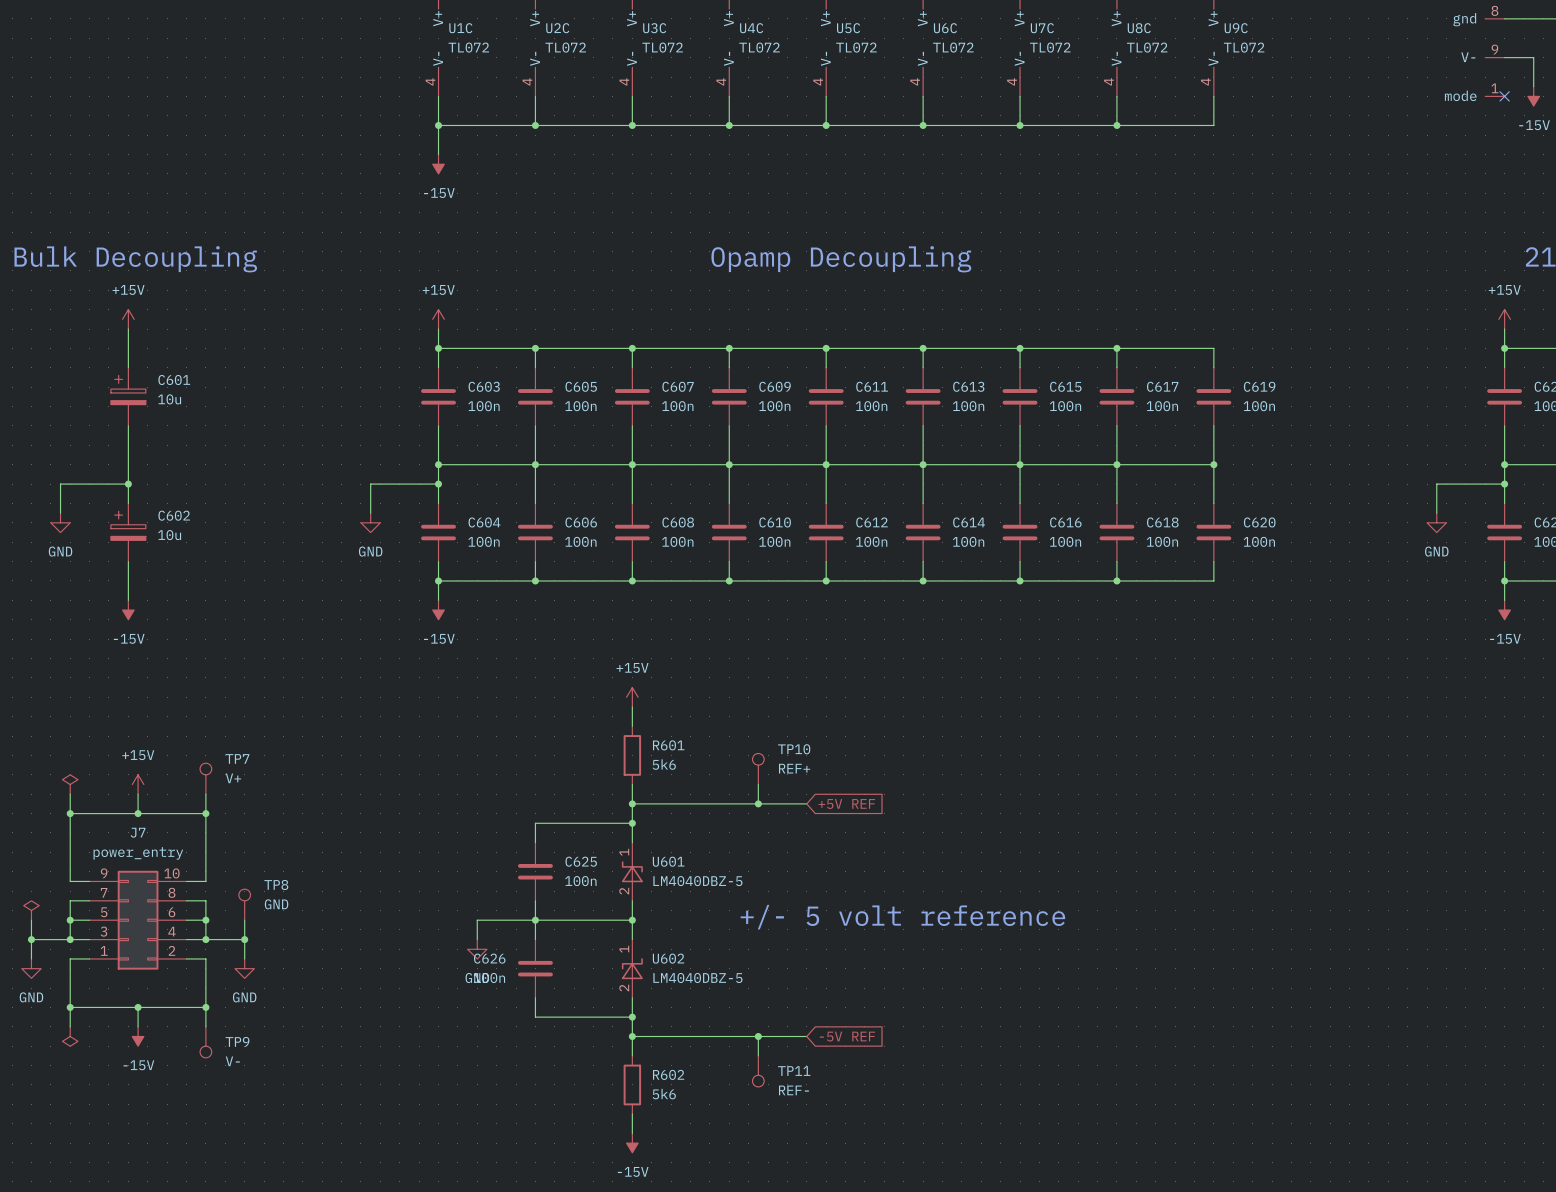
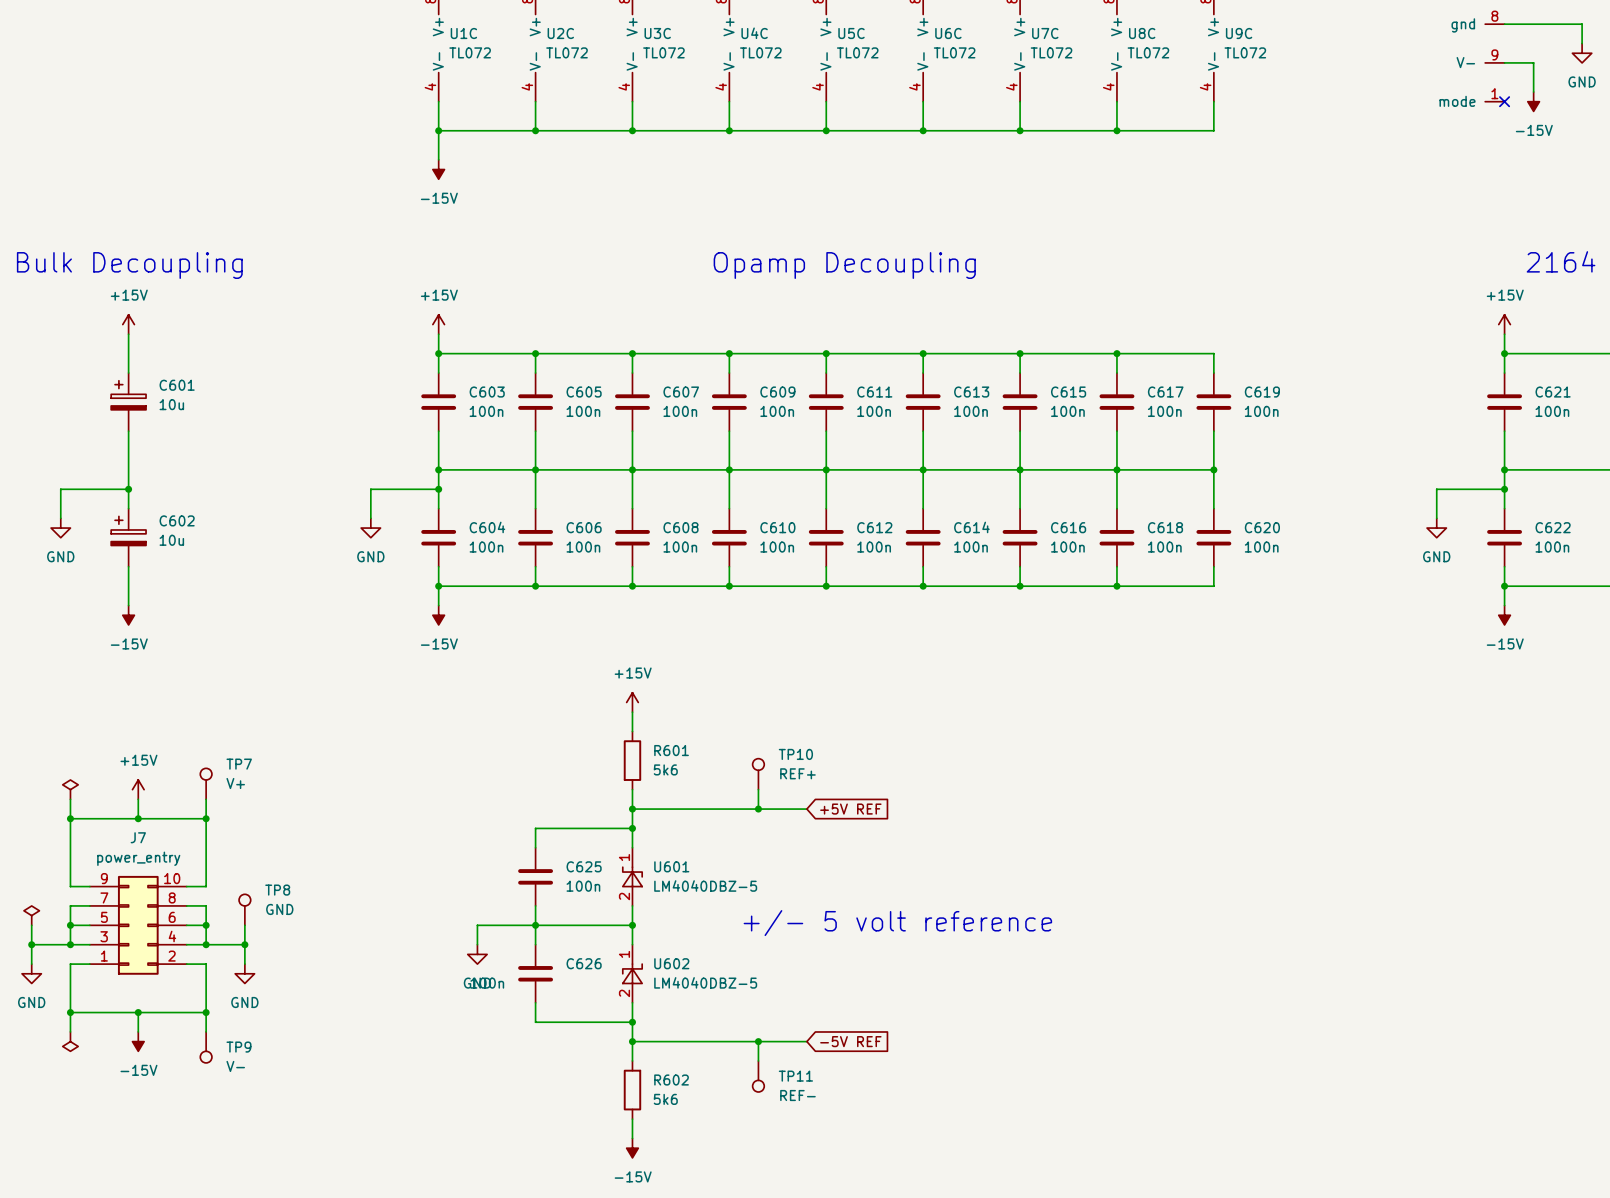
C626 name position: C626 (489, 958) -> C626 (584, 963)

